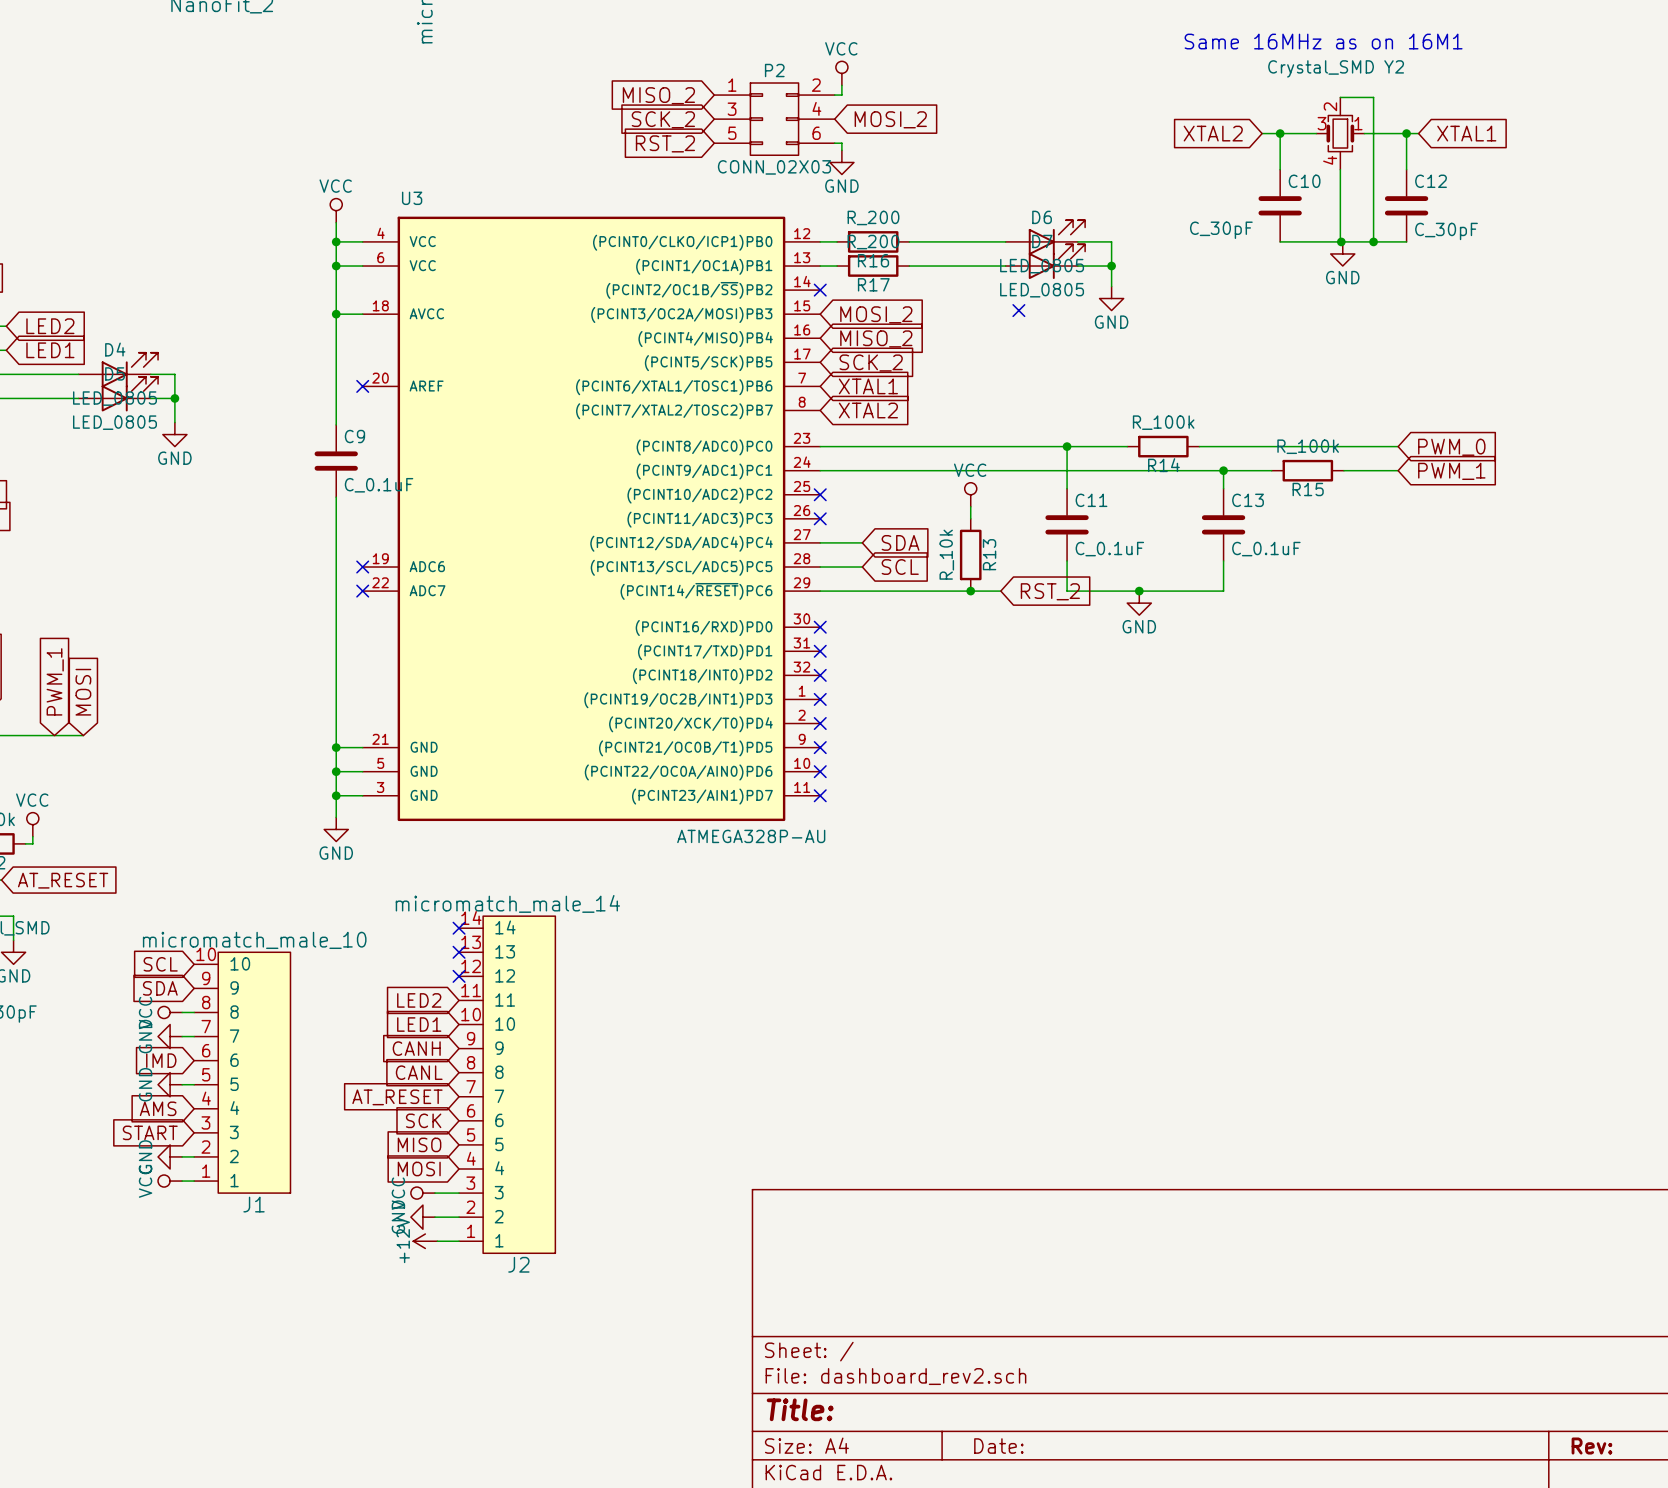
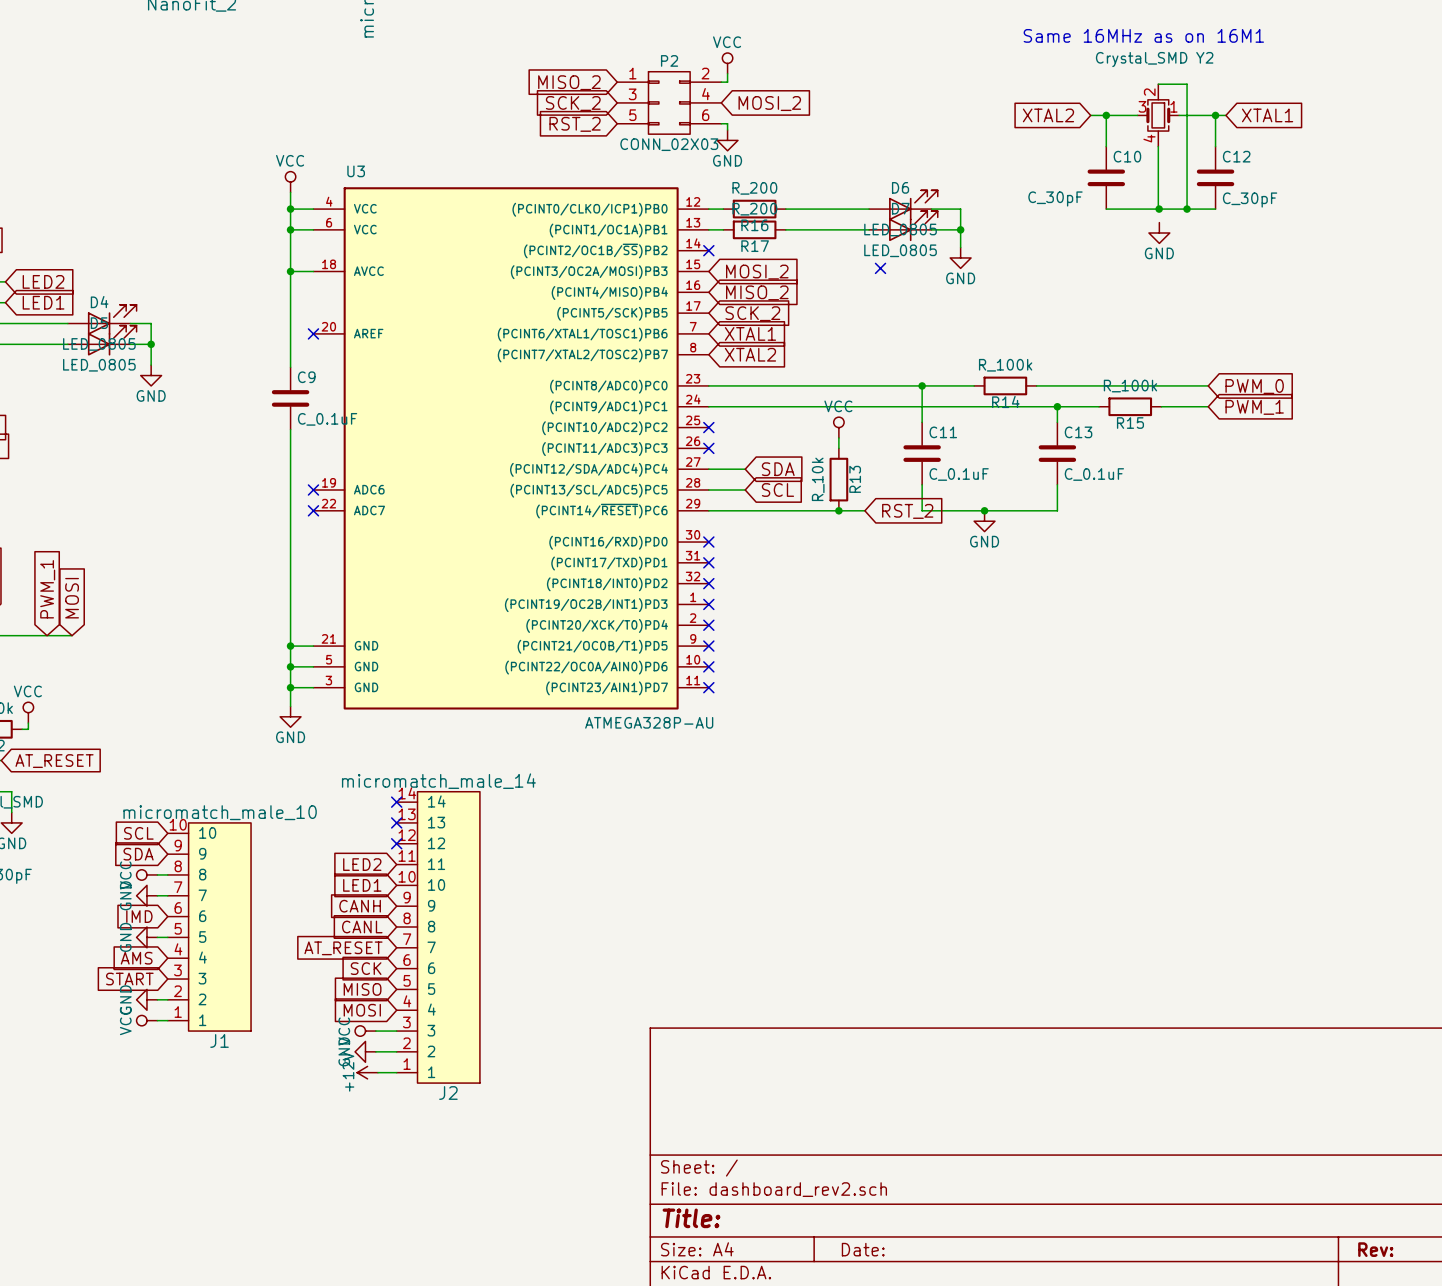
power symbol position: GND (1342, 253) -> GND (1159, 233)

